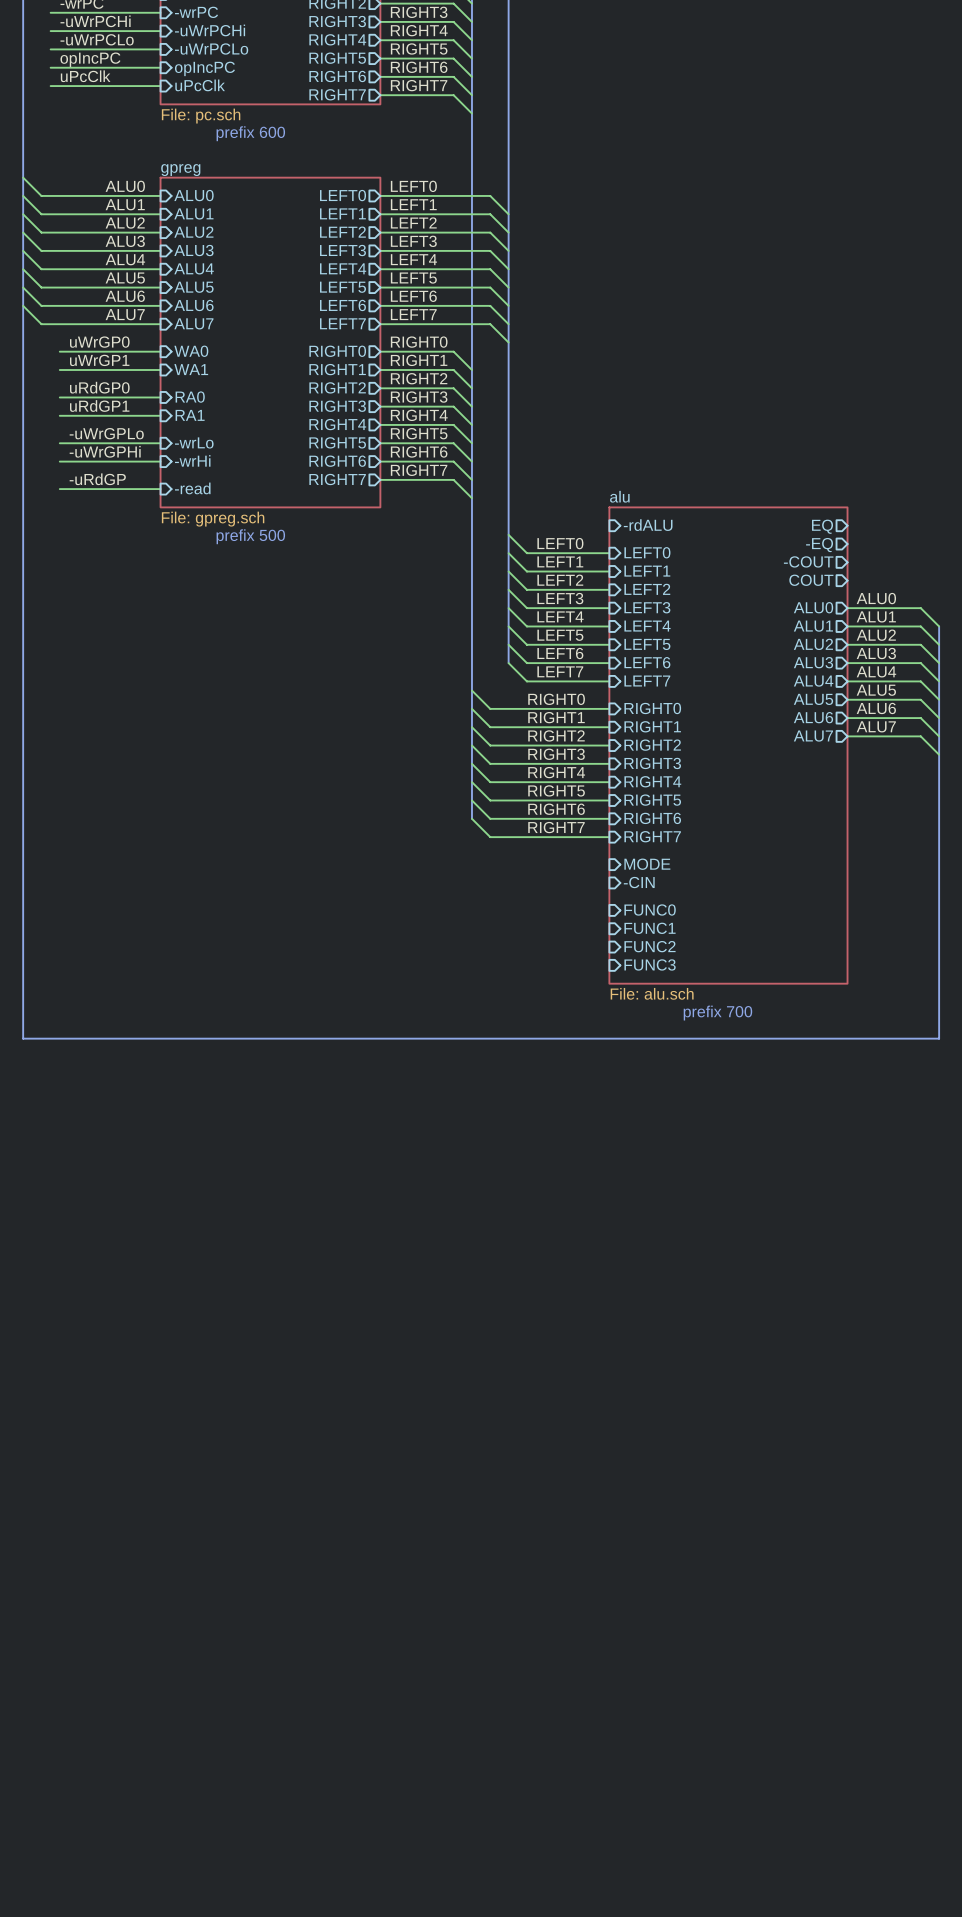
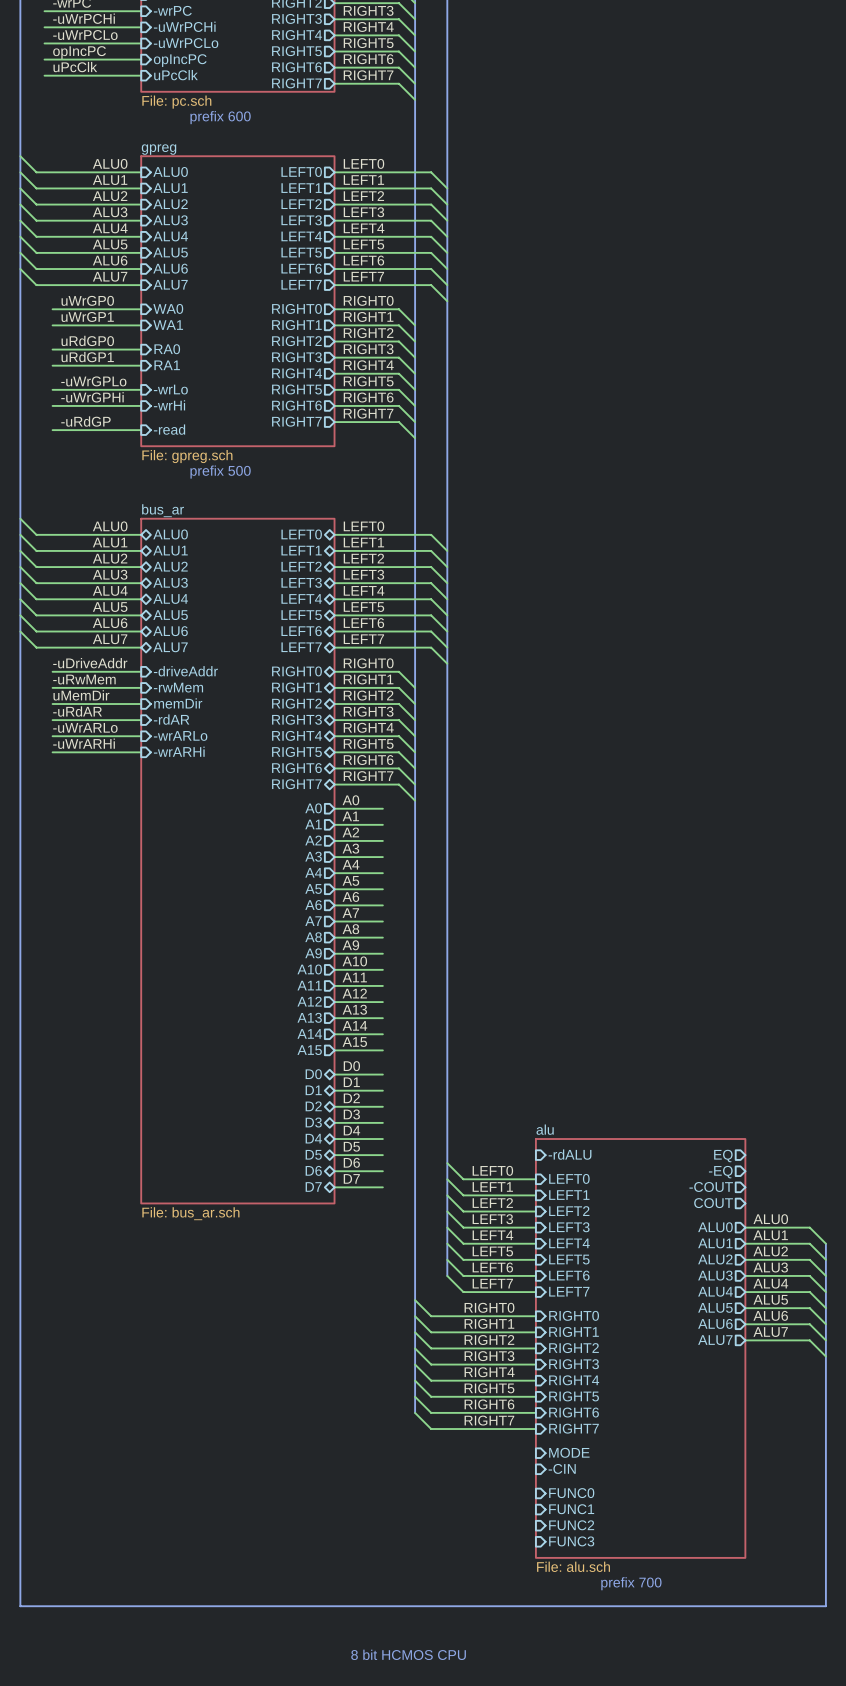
sheet pin: -rdALU (648, 525) -> none
sheet pin: EQ (822, 526) -> none
wire: (508, 534) (526, 553) (609, 553) -> none
label position: LEFT0 (560, 543) -> LEFT0 (363, 526)
sheet pin: -EQ (819, 545) -> none
sheet pin: LEFT0 (647, 552) -> none
wire: (508, 553) (526, 571) (609, 571) -> none
label position: LEFT1 (560, 561) -> LEFT1 (363, 542)
sheet pin: -COUT (808, 561) -> none
wire: (508, 571) (526, 589) (609, 589) -> none
sheet pin: LEFT1 (647, 571) -> none
label position: LEFT2 (560, 580) -> LEFT2 (363, 558)
sheet pin: COUT (811, 580) -> none
wire: none -> (20, 518) (36, 534) (141, 534)
wire: (508, 589) (526, 608) (609, 608) -> none
sheet pin: LEFT2 (647, 589) -> none
label: none -> ALU0 (110, 526)
label position: LEFT3 (560, 598) -> LEFT3 (363, 574)
label: ALU0 (876, 598) -> none
sheet pin: none -> ALU0 (170, 534)
sheet pin: none -> LEFT0 (301, 534)
sheet pin: LEFT3 (647, 607) -> none
sheet pin: ALU0 (813, 607) -> none
wire: none -> (20, 534) (36, 550) (141, 550)
wire: (508, 608) (526, 626) (609, 626) -> none
wire: (847, 608) (920, 608) (939, 626) -> none
label: none -> ALU1 (110, 542)
label position: LEFT4 (560, 616) -> LEFT4 (364, 590)
label: ALU1 (876, 616) -> none
wire: none -> (20, 550) (36, 567) (141, 567)
sheet pin: none -> ALU1 (170, 550)
sheet pin: none -> LEFT1 (301, 550)
wire: (508, 626) (526, 644) (609, 644) -> (447, 550) (431, 534) (334, 534)
sheet pin: LEFT4 (647, 626) -> none
sheet pin: ALU1 (813, 626) -> none
wire: (847, 626) (920, 626) (939, 644) -> none
bus: (939, 626) (939, 1038) (23, 1038) -> (825, 1243) (825, 1606) (20, 1606) (20, 913)
label: none -> ALU2 (110, 558)
label position: LEFT5 (560, 635) -> LEFT5 (363, 607)
label: ALU2 (876, 635) -> none
wire: none -> (20, 567) (36, 583) (141, 583)
sheet pin: none -> ALU2 (170, 566)
sheet pin: none -> LEFT2 (301, 566)
wire: (508, 644) (526, 663) (609, 663) -> (447, 567) (431, 550) (334, 550)
sheet pin: LEFT5 (647, 644) -> none
sheet pin: ALU2 (813, 644) -> none
wire: (847, 644) (920, 644) (939, 663) -> none
label: none -> ALU3 (110, 574)
label position: LEFT6 (560, 653) -> LEFT6 (363, 623)
label: ALU3 (876, 653) -> none
sheet pin: none -> ALU3 (170, 582)
sheet pin: none -> LEFT3 (301, 582)
sheet pin: LEFT6 (647, 662) -> none
sheet pin: ALU3 (813, 662) -> none
wire: none -> (20, 583) (36, 599) (141, 599)
wire: none -> (334, 583) (431, 583) (447, 599)
wire: (508, 663) (526, 681) (609, 681) -> (447, 583) (431, 567) (334, 567)
bus: none -> (447, 583) (447, 1275)
wire: (847, 663) (920, 663) (939, 681) -> none
label: none -> ALU4 (110, 590)
label position: LEFT7 (560, 671) -> LEFT7 (363, 639)
label: ALU4 (876, 671) -> none
wire: none -> (20, 599) (36, 615) (141, 615)
sheet pin: none -> ALU4 (170, 598)
sheet pin: none -> LEFT4 (301, 598)
wire: none -> (334, 599) (431, 599) (447, 615)
sheet pin: LEFT7 (647, 681) -> none
sheet pin: ALU4 (813, 681) -> none
wire: (847, 681) (920, 681) (939, 699) -> none
label: none -> ALU5 (110, 607)
wire: (471, 690) (490, 708) (609, 708) -> none
label: ALU5 (876, 690) -> none
wire: none -> (20, 615) (36, 631) (141, 631)
sheet pin: none -> ALU5 (170, 615)
sheet pin: none -> LEFT5 (301, 615)
wire: none -> (334, 615) (431, 615) (447, 631)
label position: RIGHT0 (556, 699) -> RIGHT0 (368, 663)
sheet pin: ALU5 (813, 699) -> none
wire: (847, 699) (920, 699) (939, 718) -> none
label: none -> ALU6 (110, 623)
wire: (471, 708) (490, 727) (609, 727) -> none
sheet pin: RIGHT0 (652, 708) -> none
label: ALU6 (876, 708) -> none
sheet pin: none -> ALU6 (170, 631)
sheet pin: none -> LEFT6 (301, 631)
label position: RIGHT1 (556, 717) -> RIGHT1 (368, 679)
sheet pin: ALU6 (813, 717) -> none
wire: none -> (20, 631) (36, 647) (141, 647)
wire: none -> (334, 631) (431, 631) (447, 647)
wire: (847, 718) (920, 718) (939, 736) -> none
label: none -> ALU7 (110, 639)
sheet pin: RIGHT1 (652, 726) -> none
label: ALU7 (876, 726) -> none
wire: (471, 727) (490, 745) (609, 745) -> none
sheet pin: none -> LEFT7 (301, 647)
label position: RIGHT2 (556, 735) -> RIGHT2 (368, 695)
sheet pin: none -> ALU7 (170, 647)
wire: none -> (334, 647) (431, 647) (447, 663)
sheet pin: ALU7 (813, 736) -> none
wire: (847, 736) (920, 736) (939, 754) -> none
wire: (471, 745) (490, 763) (609, 763) -> none
sheet pin: RIGHT2 (652, 745) -> none
sheet alu: File: alu.sch (728, 745) -> none
label: none -> -uDriveAddr (90, 663)
label position: RIGHT3 (556, 754) -> RIGHT3 (368, 711)
wire: none -> (52, 671) (141, 671)
sheet pin: none -> -driveAddr (185, 671)
sheet pin: none -> RIGHT0 (296, 671)
wire: (471, 763) (490, 782) (609, 782) -> none
sheet pin: RIGHT3 (652, 763) -> none
label: none -> -uRwMem (84, 679)
label position: RIGHT4 (556, 772) -> RIGHT4 (368, 727)
sheet pin: none -> -rwMem (178, 687)
sheet pin: none -> RIGHT1 (296, 687)
sheet pin: RIGHT4 (652, 781) -> none
wire: none -> (52, 687) (141, 687)
wire: (471, 782) (490, 800) (609, 800) -> (415, 687) (398, 671) (334, 671)
label: none -> uMemDir (81, 695)
label position: RIGHT5 (556, 790) -> RIGHT5 (368, 743)
sheet pin: none -> memDir (178, 703)
wire: none -> (52, 704) (141, 704)
sheet pin: none -> RIGHT2 (296, 703)
wire: (471, 800) (490, 818) (609, 818) -> (415, 704) (398, 687) (334, 687)
sheet pin: RIGHT5 (652, 800) -> none
label: none -> -uRdAR (77, 711)
label position: RIGHT6 (556, 809) -> RIGHT6 (368, 760)
wire: none -> (52, 720) (141, 720)
sheet pin: none -> -rdAR (171, 719)
sheet pin: none -> RIGHT3 (296, 719)
wire: none -> (334, 720) (398, 720) (415, 736)
wire: (471, 818) (490, 837) (609, 837) -> (415, 720) (398, 704) (334, 704)
bus: none -> (415, 720) (415, 1412)
sheet pin: RIGHT6 (652, 818) -> none
label: none -> -uWrARLo (85, 727)
label position: RIGHT7 (556, 827) -> RIGHT7 (368, 776)
sheet pin: none -> -wrARLo (180, 735)
sheet pin: none -> RIGHT4 (297, 735)
sheet pin: RIGHT7 (652, 836) -> none
wire: none -> (52, 736) (141, 736)
wire: none -> (334, 736) (398, 736) (415, 752)
label: none -> -uWrARHi (84, 743)
sheet pin: none -> -wrARHi (179, 751)
wire: none -> (52, 752) (141, 752)
sheet pin: none -> RIGHT5 (296, 751)
wire: none -> (334, 752) (398, 752) (415, 768)
sheet pin: MODE (647, 864) -> none
sheet pin: none -> RIGHT6 (296, 768)
wire: none -> (334, 768) (398, 768) (415, 784)
sheet pin: -CIN (639, 882) -> none
sheet pin: none -> RIGHT7 (296, 784)
wire: none -> (334, 784) (398, 784) (415, 800)
label: none -> A0 (350, 800)
sheet pin: FUNC0 (650, 910) -> none
sheet pin: none -> A0 (313, 808)
wire: none -> (334, 808) (382, 808)
label: none -> A1 (350, 816)
sheet pin: FUNC1 (650, 928) -> none
sheet pin: none -> A1 (313, 824)
wire: none -> (334, 824) (382, 824)
label: none -> A2 (350, 832)
sheet pin: FUNC2 (650, 946) -> none
sheet pin: none -> A2 (313, 840)
wire: none -> (334, 840) (382, 840)
label: none -> A3 (350, 848)
sheet pin: FUNC3 (650, 964) -> none
sheet pin: none -> A3 (313, 856)
wire: none -> (334, 857) (382, 857)
sheet bus_ar: none -> File: bus_ar.sch (237, 861)
label: none -> A4 (350, 864)
sheet pin: none -> A4 (313, 872)
wire: none -> (334, 873) (382, 873)
label: none -> A5 (350, 880)
sheet pin: none -> A5 (313, 888)
wire: none -> (334, 889) (382, 889)
text: prefix 700 (717, 1013) -> none
label: none -> A6 (350, 896)
sheet pin: none -> A6 (313, 905)
wire: none -> (334, 905) (382, 905)
label: none -> A7 (350, 913)
sheet pin: none -> A7 (313, 921)
wire: none -> (334, 921) (382, 921)
label: none -> A8 (350, 929)
sheet pin: none -> A8 (313, 937)
wire: none -> (334, 937) (382, 937)
label: none -> A9 (350, 945)
sheet pin: none -> A9 (313, 953)
wire: none -> (334, 953) (382, 953)
label: none -> A10 (354, 961)
sheet pin: none -> A10 (309, 969)
wire: none -> (334, 969) (382, 969)
label: none -> A11 (354, 977)
sheet pin: none -> A11 (309, 985)
wire: none -> (334, 985) (382, 985)
label: none -> A12 (354, 993)
sheet pin: none -> A12 (309, 1001)
wire: none -> (334, 1002) (382, 1002)
label: none -> A13 (354, 1009)
sheet pin: none -> A13 (309, 1017)
wire: none -> (334, 1018) (382, 1018)
label: none -> A14 (354, 1025)
sheet pin: none -> A14 (309, 1033)
wire: none -> (334, 1034) (382, 1034)
label: none -> A15 (354, 1042)
sheet pin: none -> A15 (309, 1050)
wire: none -> (334, 1050) (382, 1050)
label: none -> D0 (351, 1066)
sheet pin: none -> D0 (313, 1074)
wire: none -> (334, 1074) (382, 1074)
label: none -> D1 (351, 1082)
sheet pin: none -> D1 (313, 1090)
wire: none -> (334, 1090) (382, 1090)
label: none -> D2 (351, 1098)
sheet pin: none -> D2 (313, 1106)
wire: none -> (334, 1106) (382, 1106)
label: none -> D3 (351, 1114)
sheet pin: none -> D3 (313, 1122)
wire: none -> (334, 1122) (382, 1122)
label: none -> D4 (351, 1130)
sheet pin: none -> D4 (313, 1138)
wire: none -> (334, 1139) (382, 1139)
label: none -> D5 (351, 1146)
sheet pin: none -> -rdALU (570, 1154)
sheet pin: none -> D5 (313, 1154)
wire: none -> (334, 1155) (382, 1155)
sheet pin: none -> EQ (723, 1156)
label: none -> D6 (351, 1162)
wire: none -> (447, 1163) (463, 1179) (535, 1179)
sheet pin: none -> D6 (313, 1170)
wire: none -> (334, 1171) (382, 1171)
label: none -> LEFT0 (492, 1170)
sheet pin: none -> -EQ (720, 1172)
label: none -> D7 (351, 1178)
wire: none -> (447, 1179) (463, 1195) (535, 1195)
sheet pin: none -> LEFT0 (569, 1178)
sheet pin: none -> D7 (313, 1186)
label: none -> LEFT1 (492, 1186)
sheet pin: none -> -COUT (711, 1186)
wire: none -> (334, 1187) (382, 1187)
sheet pin: none -> LEFT1 (569, 1195)
wire: none -> (447, 1195) (463, 1211) (535, 1211)
label: none -> LEFT2 (492, 1203)
sheet pin: none -> COUT (713, 1203)
wire: none -> (447, 1211) (463, 1227) (535, 1227)
sheet pin: none -> LEFT2 (569, 1211)
label: none -> LEFT3 (492, 1219)
label: none -> ALU0 (770, 1219)
wire: none -> (447, 1227) (463, 1243) (535, 1243)
sheet pin: none -> LEFT3 (569, 1227)
sheet pin: none -> ALU0 (715, 1227)
wire: none -> (745, 1227) (809, 1227) (825, 1243)
label: none -> LEFT4 (492, 1235)
label: none -> ALU1 (770, 1235)
sheet pin: none -> LEFT4 (569, 1243)
sheet pin: none -> ALU1 (715, 1243)
wire: none -> (447, 1243) (463, 1259) (535, 1259)
wire: none -> (745, 1243) (809, 1243) (825, 1259)
label: none -> ALU2 (770, 1251)
label: none -> LEFT5 (492, 1251)
wire: none -> (447, 1259) (463, 1275) (535, 1275)
sheet pin: none -> LEFT5 (569, 1259)
sheet pin: none -> ALU2 (715, 1259)
wire: none -> (745, 1259) (809, 1259) (825, 1275)
label: none -> LEFT6 (492, 1267)
label: none -> ALU3 (770, 1267)
wire: none -> (447, 1275) (463, 1292) (535, 1292)
sheet pin: none -> LEFT6 (569, 1275)
sheet pin: none -> ALU3 (715, 1275)
wire: none -> (745, 1275) (809, 1275) (825, 1292)
label: none -> LEFT7 (492, 1283)
label: none -> ALU4 (770, 1283)
sheet pin: none -> LEFT7 (569, 1291)
sheet pin: none -> ALU4 (715, 1291)
wire: none -> (745, 1292) (809, 1292) (825, 1308)
label: none -> ALU5 (770, 1299)
wire: none -> (415, 1300) (431, 1316) (535, 1316)
label: none -> RIGHT0 (489, 1307)
sheet pin: none -> ALU5 (715, 1307)
wire: none -> (745, 1308) (809, 1308) (825, 1324)
wire: none -> (415, 1316) (431, 1332) (535, 1332)
sheet pin: none -> RIGHT0 (574, 1315)
label: none -> ALU6 (770, 1315)
label: none -> RIGHT1 (489, 1323)
sheet pin: none -> ALU6 (715, 1323)
wire: none -> (745, 1324) (809, 1324) (825, 1340)
wire: none -> (415, 1332) (431, 1348) (535, 1348)
sheet pin: none -> RIGHT1 (574, 1331)
label: none -> ALU7 (770, 1332)
label: none -> RIGHT2 (489, 1340)
sheet pin: none -> ALU7 (715, 1340)
wire: none -> (745, 1340) (809, 1340) (825, 1356)
sheet pin: none -> RIGHT2 (573, 1348)
wire: none -> (415, 1348) (431, 1364) (535, 1364)
sheet alu: none -> File: alu.sch (640, 1348)
label: none -> RIGHT3 (489, 1356)
wire: none -> (415, 1364) (431, 1380) (535, 1380)
sheet pin: none -> RIGHT3 (574, 1364)
label: none -> RIGHT4 (489, 1372)
wire: none -> (415, 1380) (431, 1396) (535, 1396)
sheet pin: none -> RIGHT4 (574, 1380)
label: none -> RIGHT5 (489, 1388)
sheet pin: none -> RIGHT5 (574, 1396)
wire: none -> (415, 1396) (431, 1412) (535, 1412)
label: none -> RIGHT6 (489, 1404)
wire: none -> (415, 1412) (431, 1429) (535, 1429)
sheet pin: none -> RIGHT6 (574, 1412)
label: none -> RIGHT7 (489, 1420)
sheet pin: none -> RIGHT7 (573, 1428)
sheet pin: none -> MODE (569, 1452)
sheet pin: none -> -CIN (562, 1468)
sheet pin: none -> FUNC0 (571, 1493)
sheet pin: none -> FUNC1 (571, 1509)
sheet pin: none -> FUNC2 (571, 1525)
sheet pin: none -> FUNC3 (571, 1541)
text: none -> prefix 700 (631, 1583)
text: none -> 8 bit HCMOS CPU (408, 1654)

